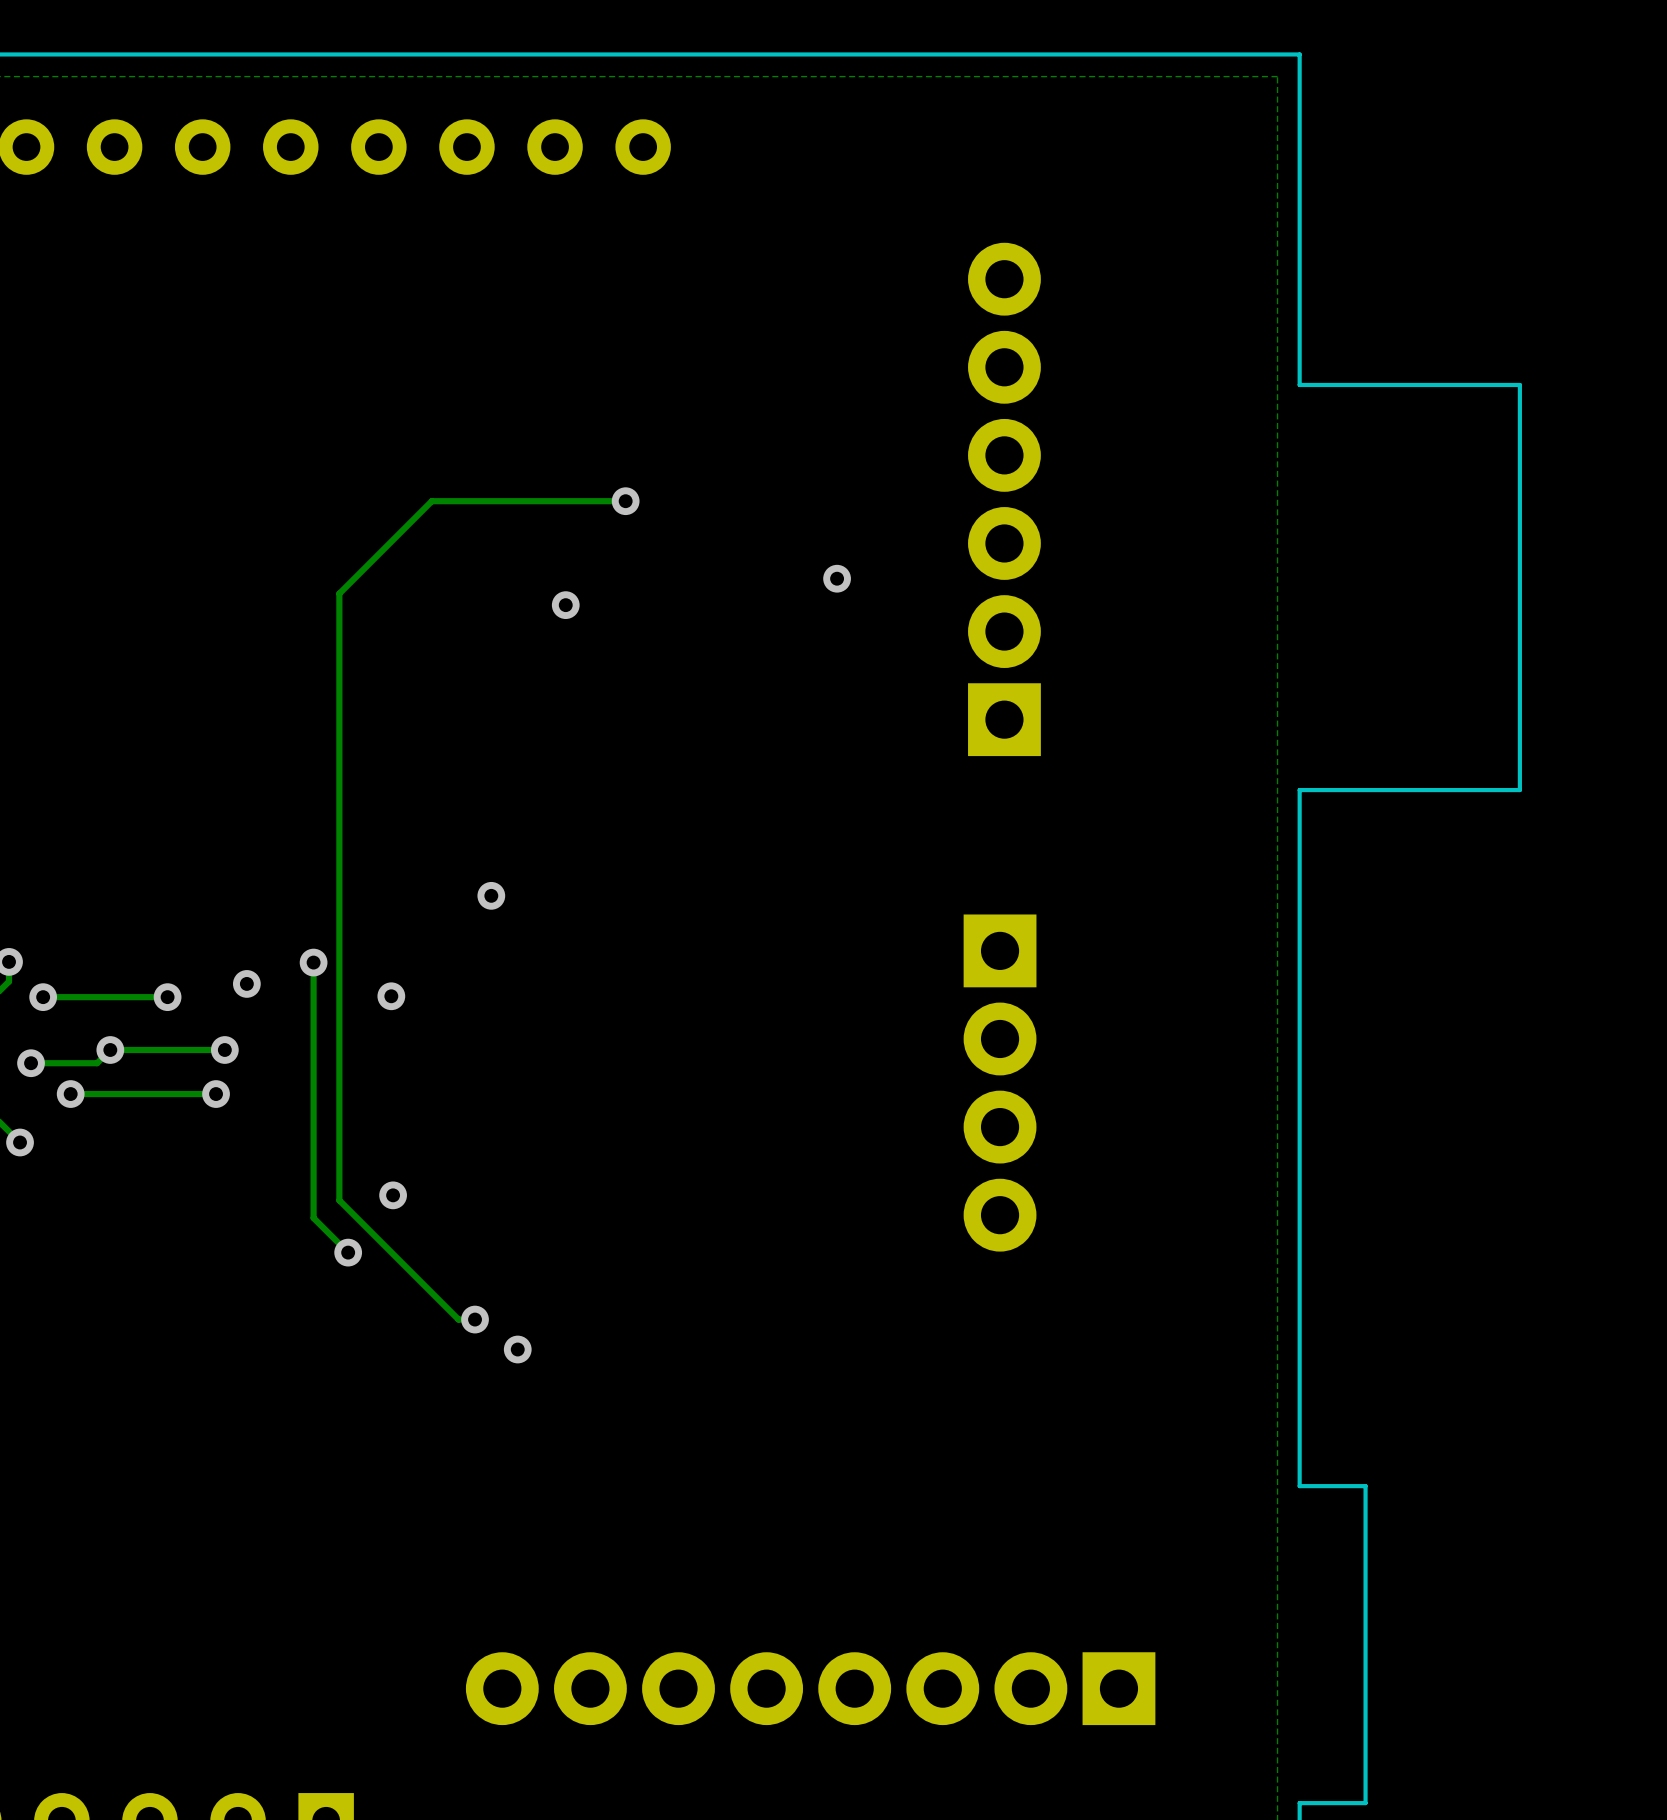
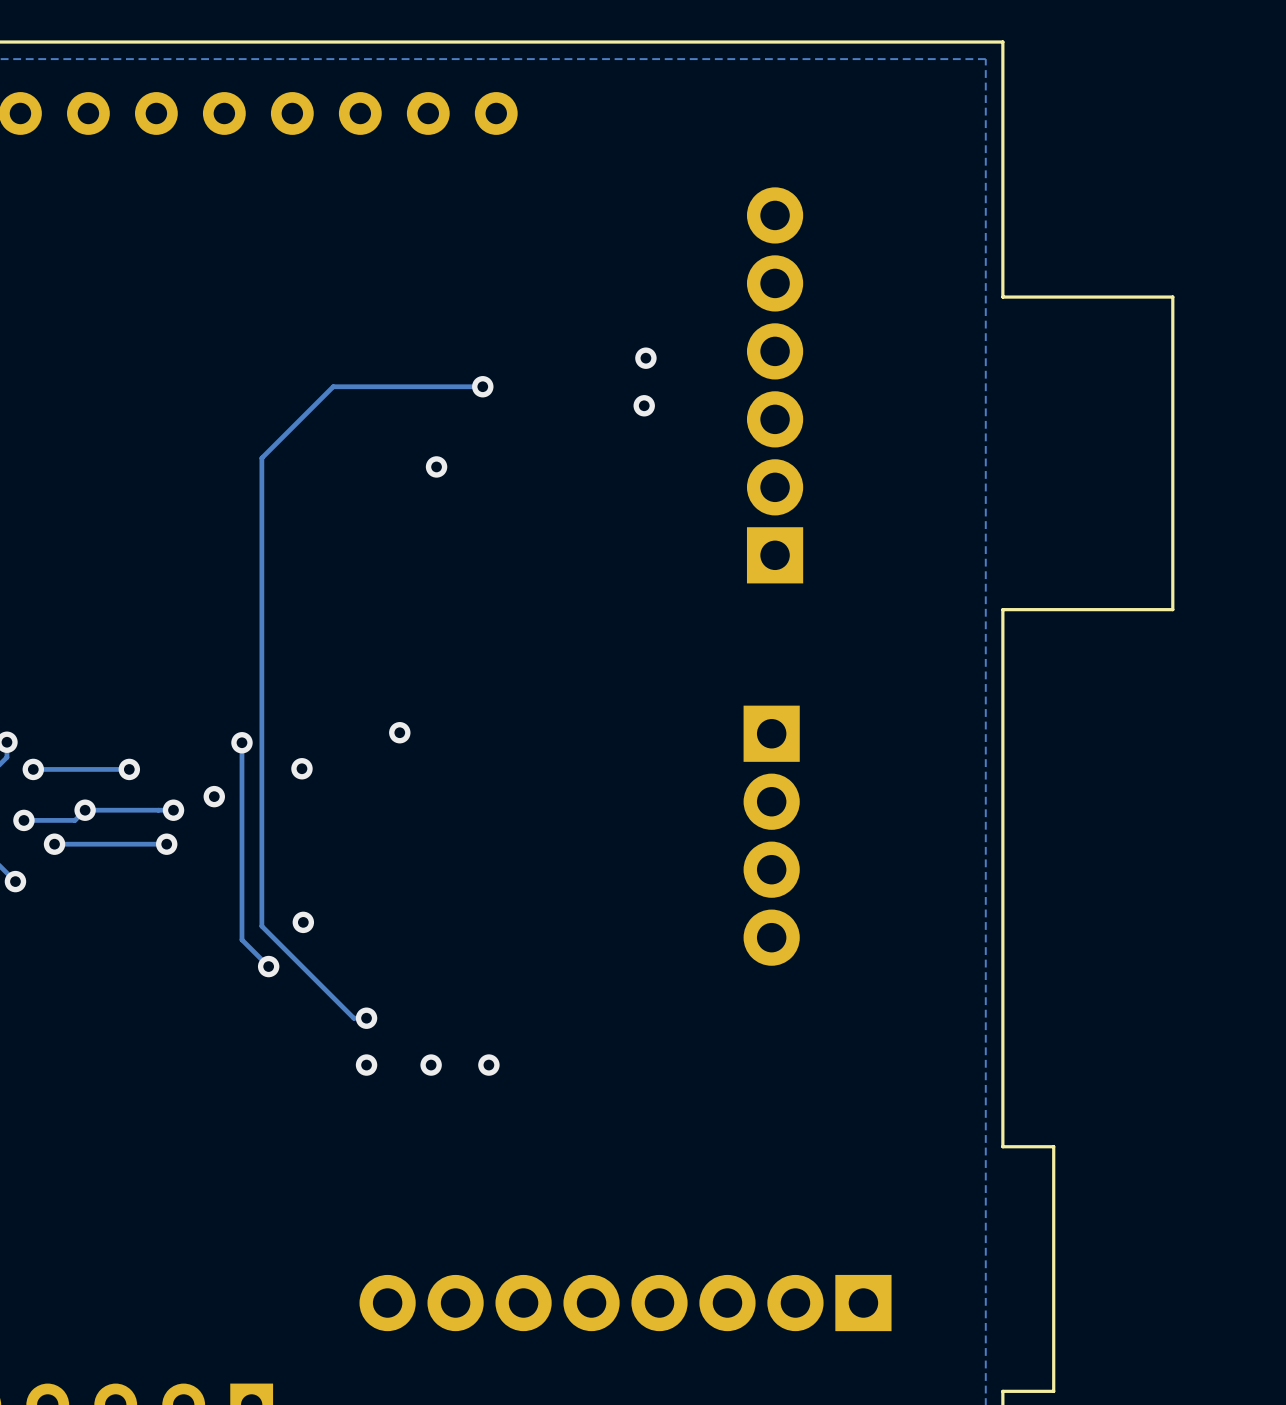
via: none -> (645, 358)
via position: (837, 578) -> (644, 405)
via position: (491, 895) -> (399, 732)
via position: (246, 983) -> (214, 796)
via: (517, 1349) -> none
via: none -> (366, 1065)
via: none -> (431, 1065)
via: none -> (488, 1065)

